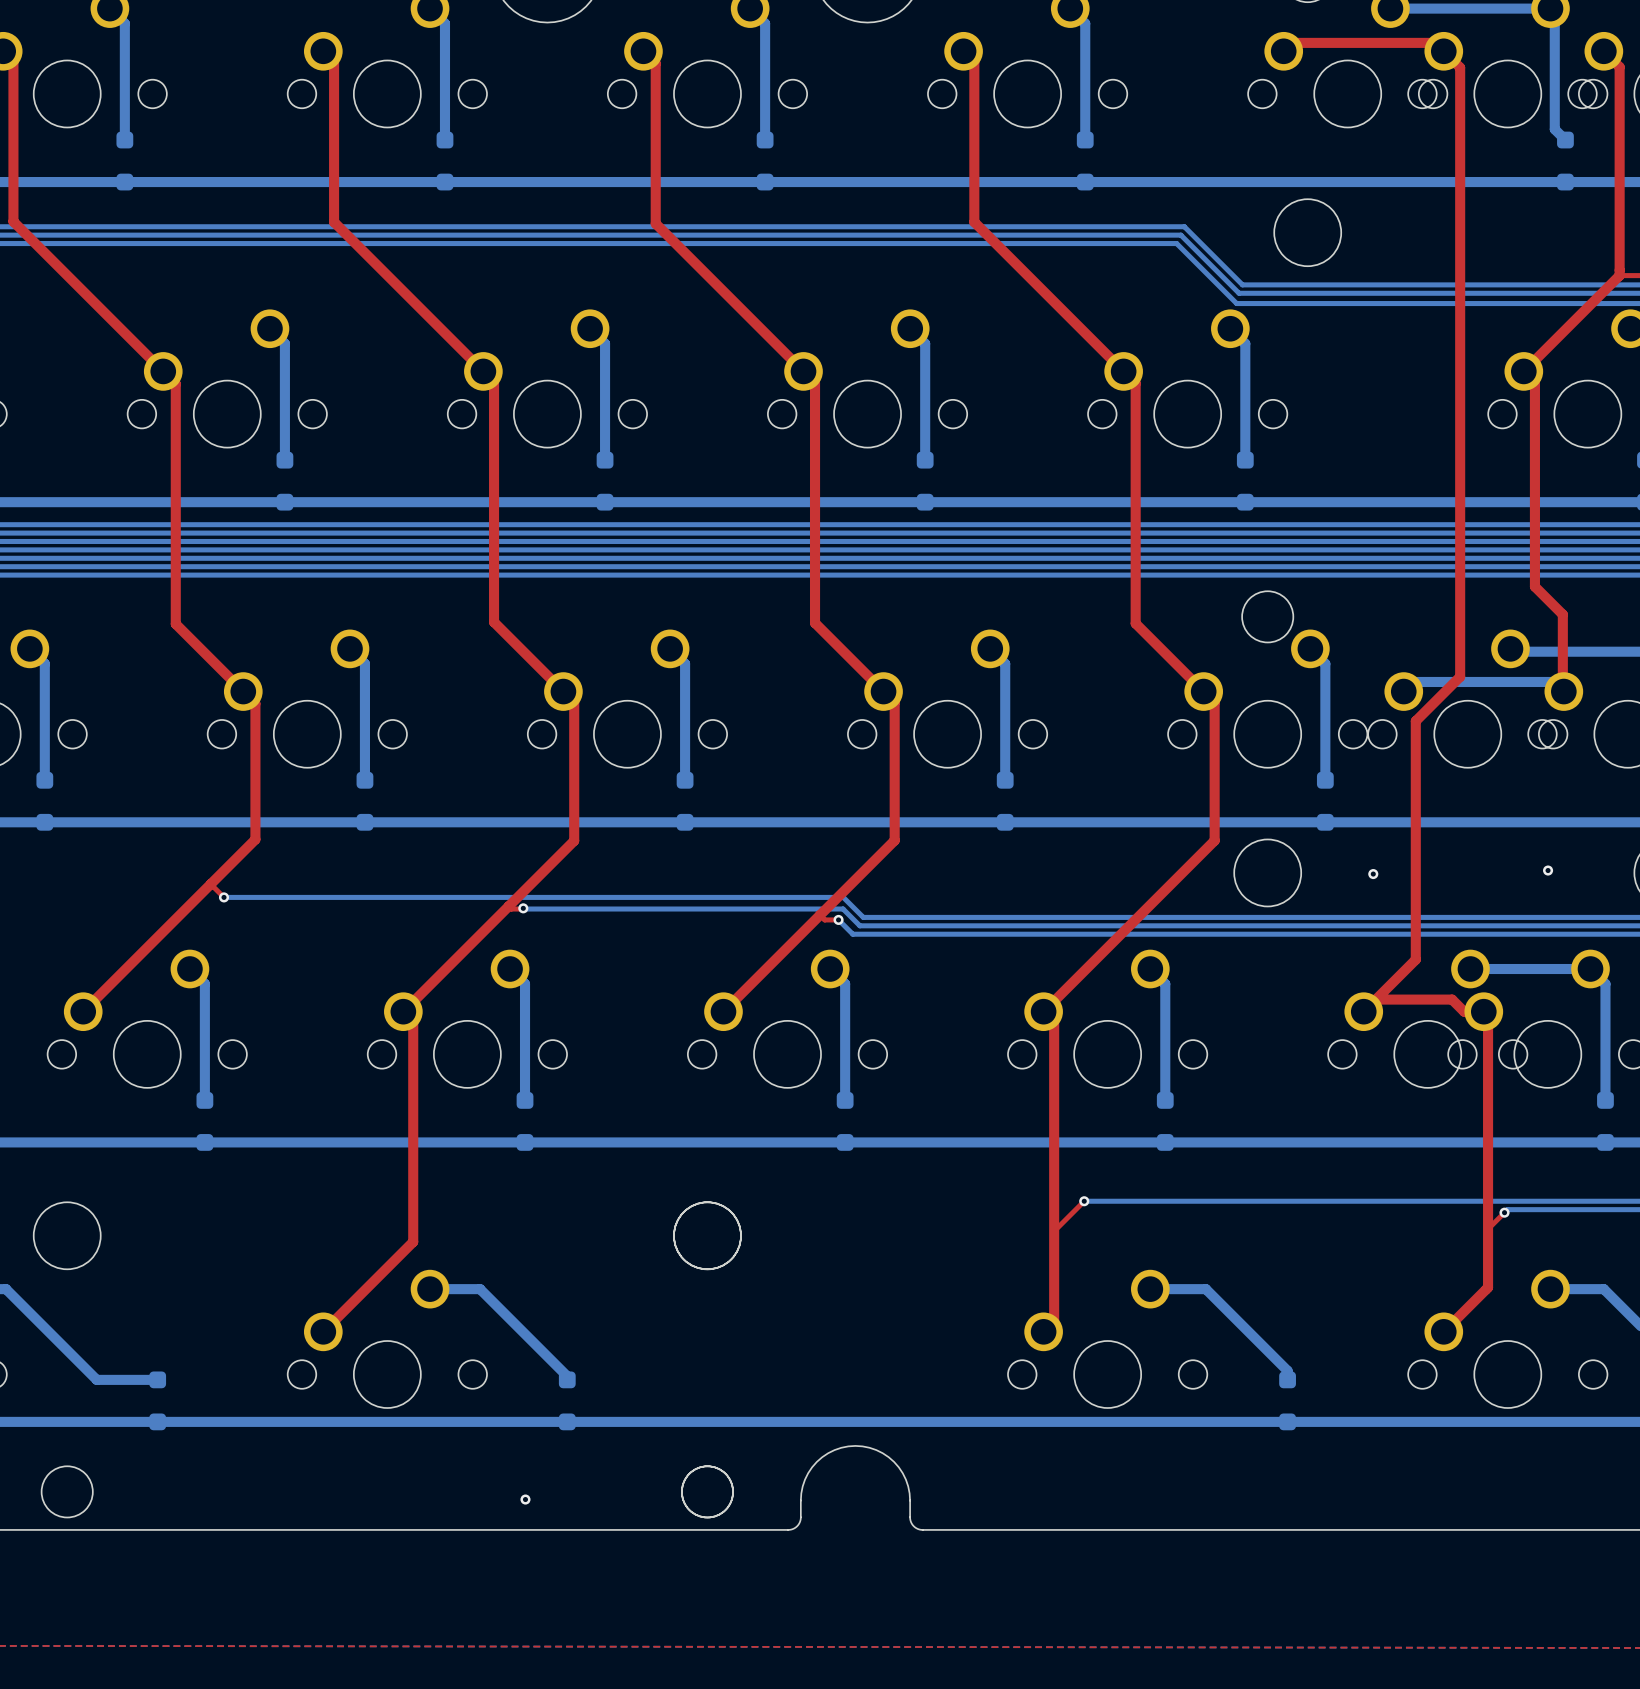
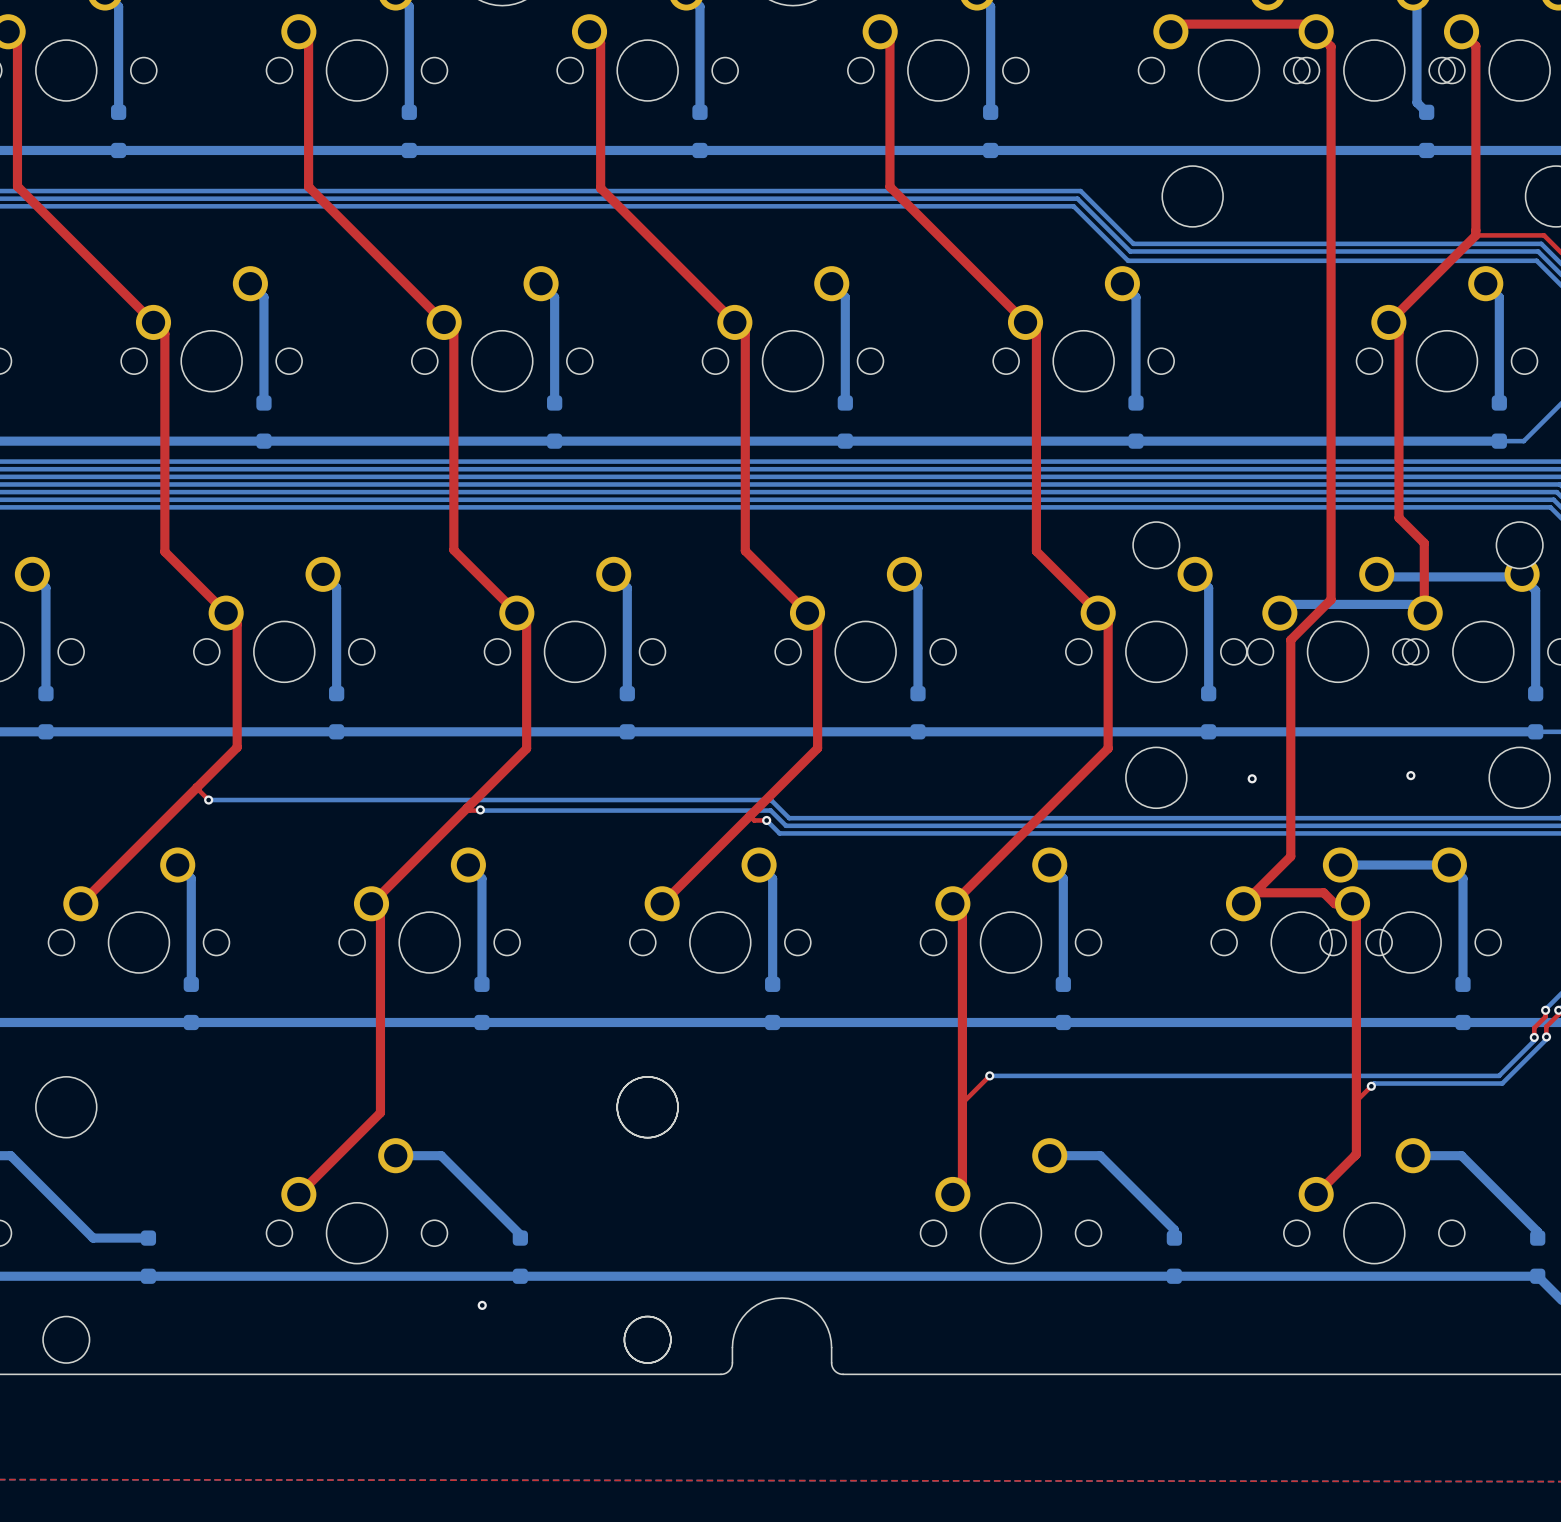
via position: (525, 1499) -> (482, 1305)

